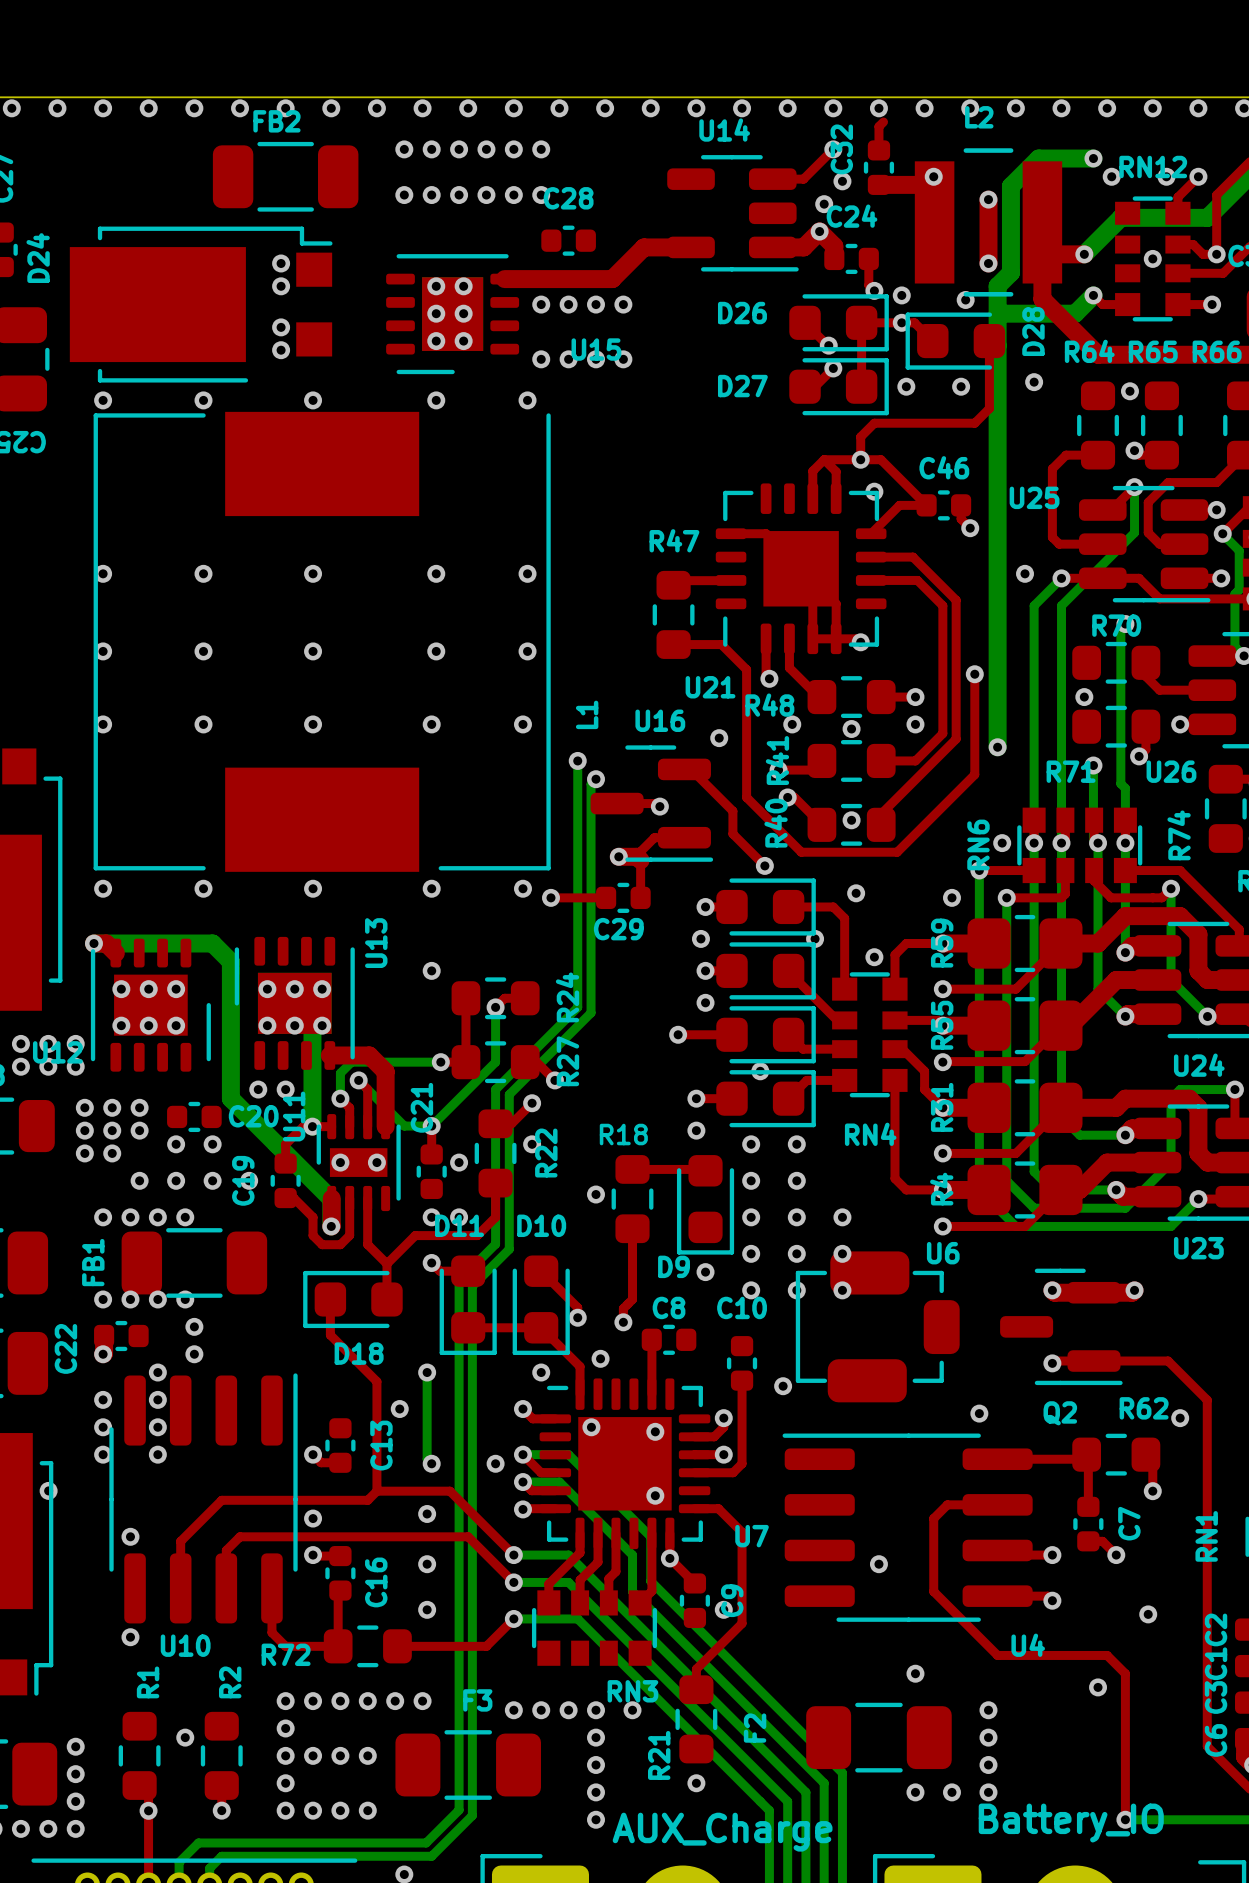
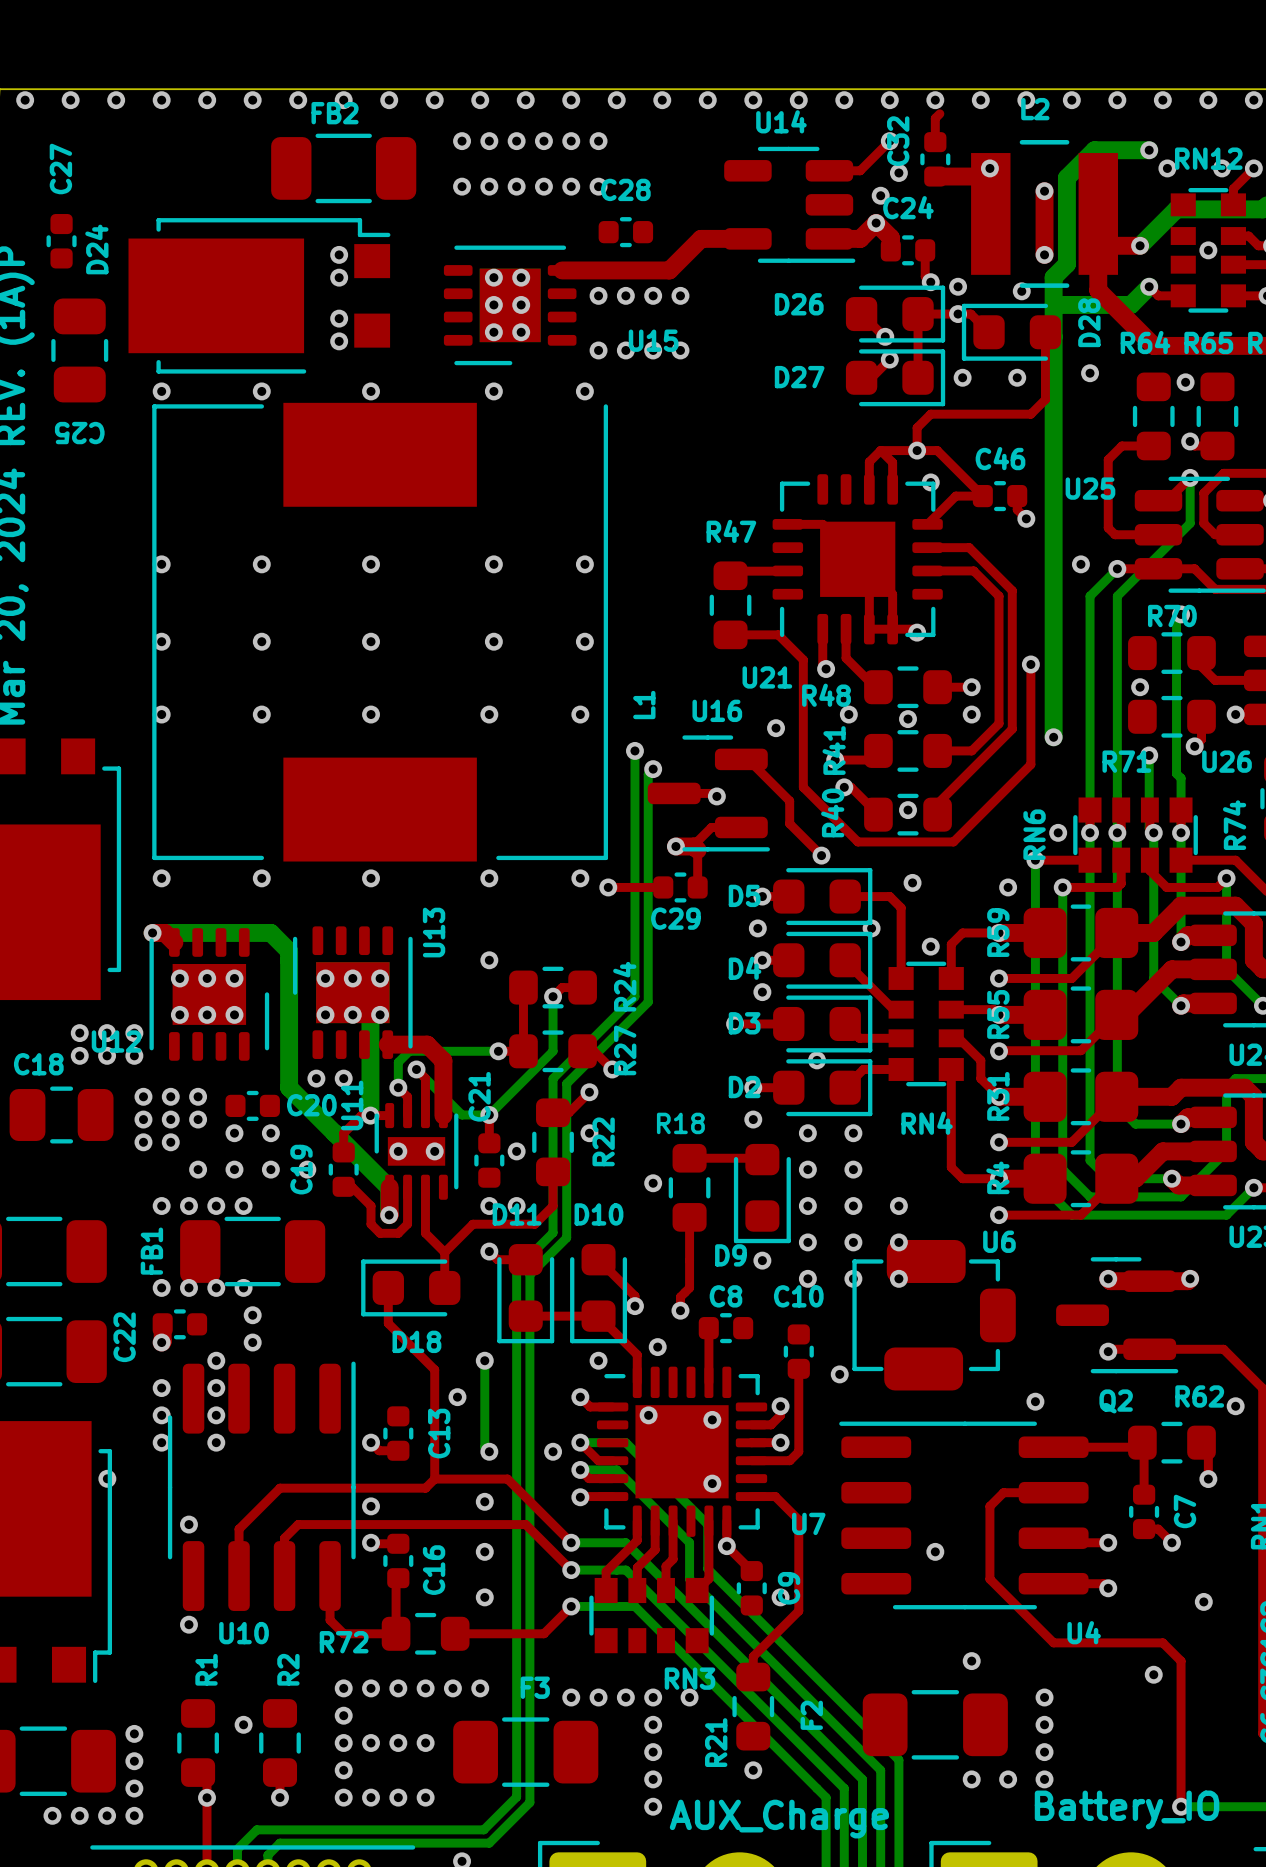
D5 name: none -> D5 (744, 895)
D4 name: none -> D4 (745, 968)
D3 name: none -> D3 (744, 1023)
D2 name: none -> D2 (744, 1087)

